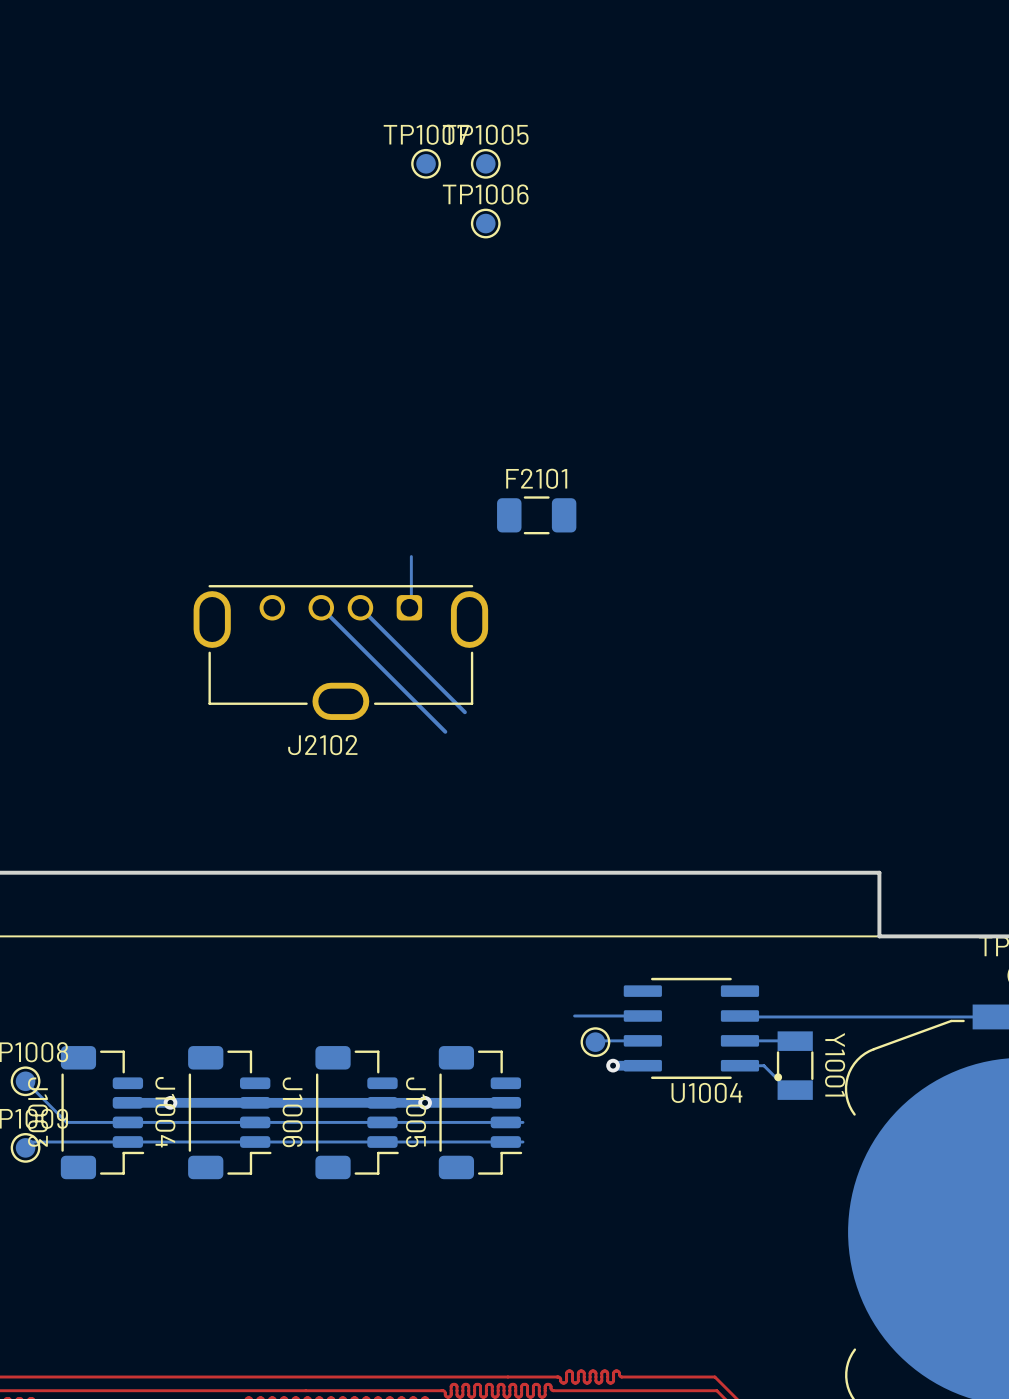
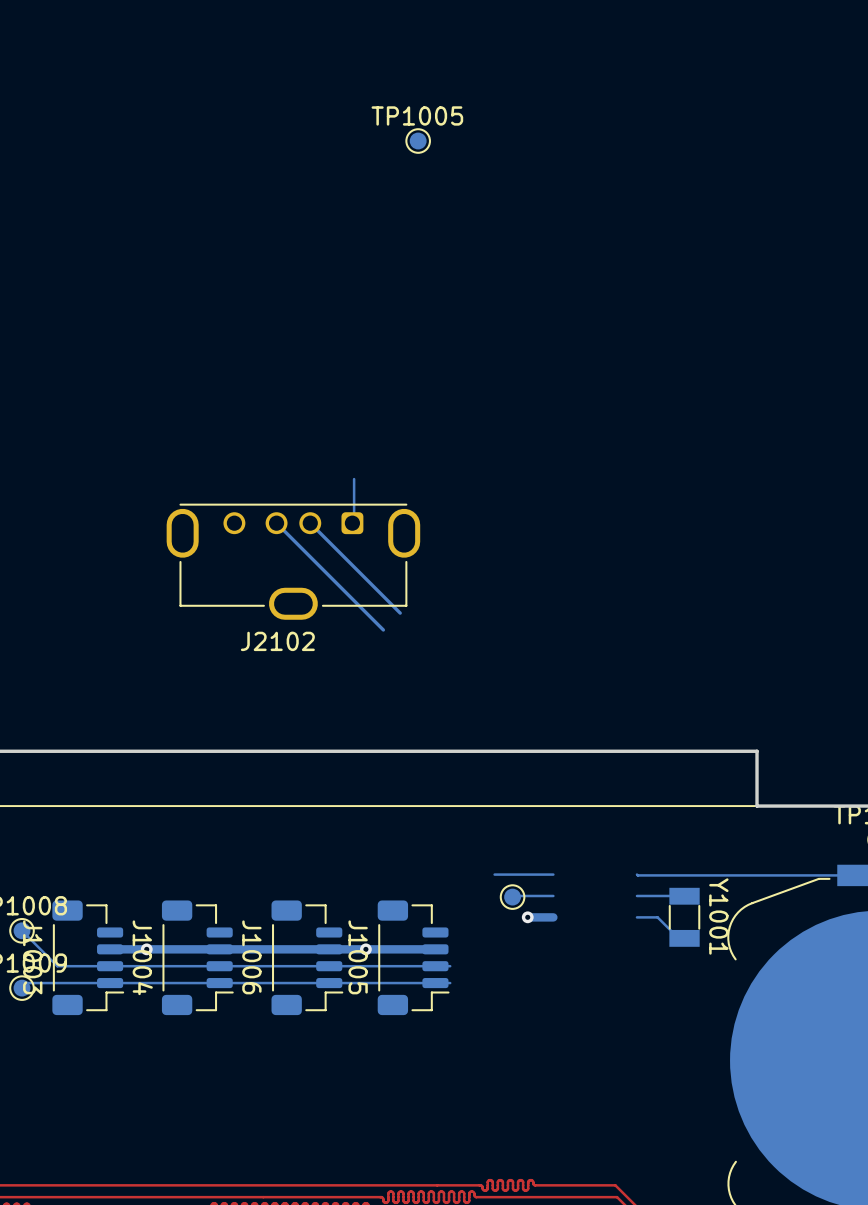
TP1007: (426, 163) -> none
TP1006: (485, 223) -> none
F2101: (536, 515) -> none
U1004: (702, 1029) -> none

